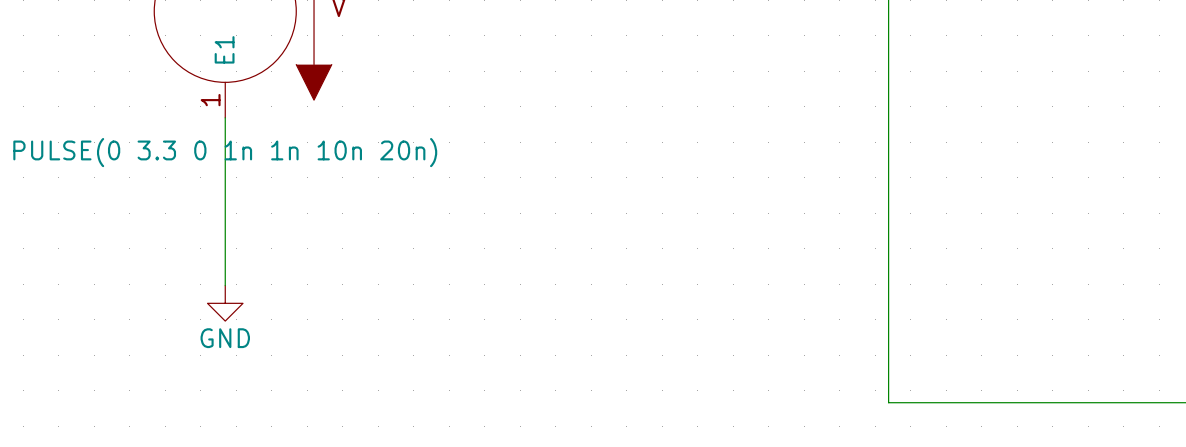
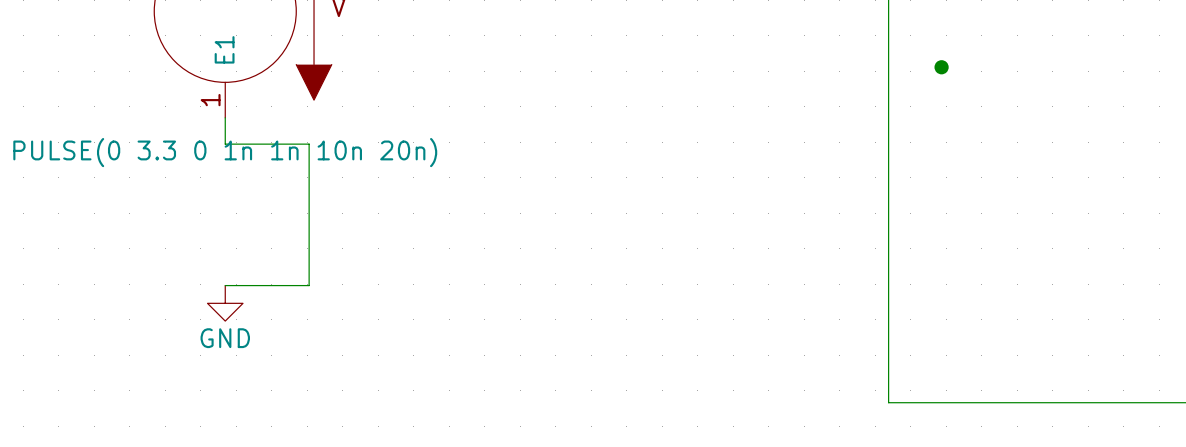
junction: none -> (941, 67)
wire: (225, 144) (225, 285) -> (225, 144) (309, 144) (309, 285) (225, 285)

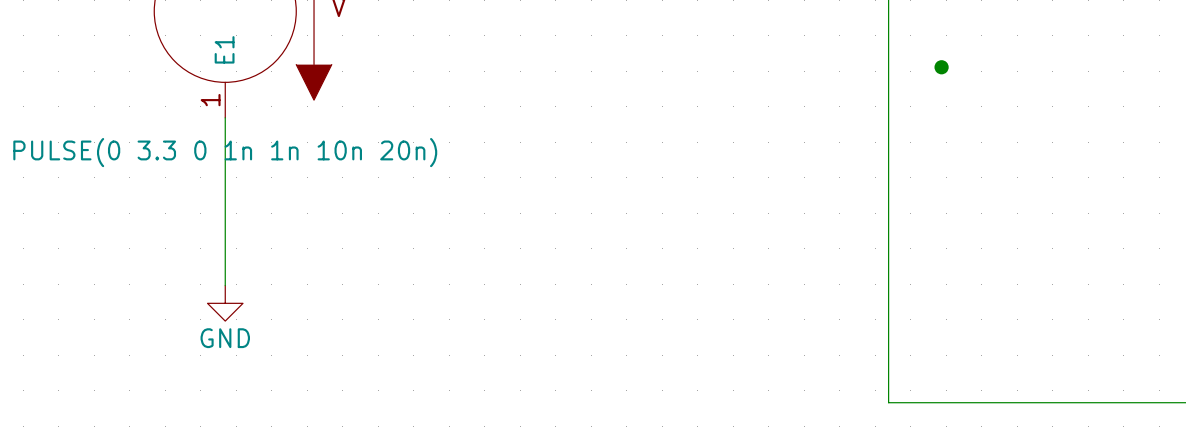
wire: (225, 144) (309, 144) (309, 285) (225, 285) -> (225, 144) (225, 285)

